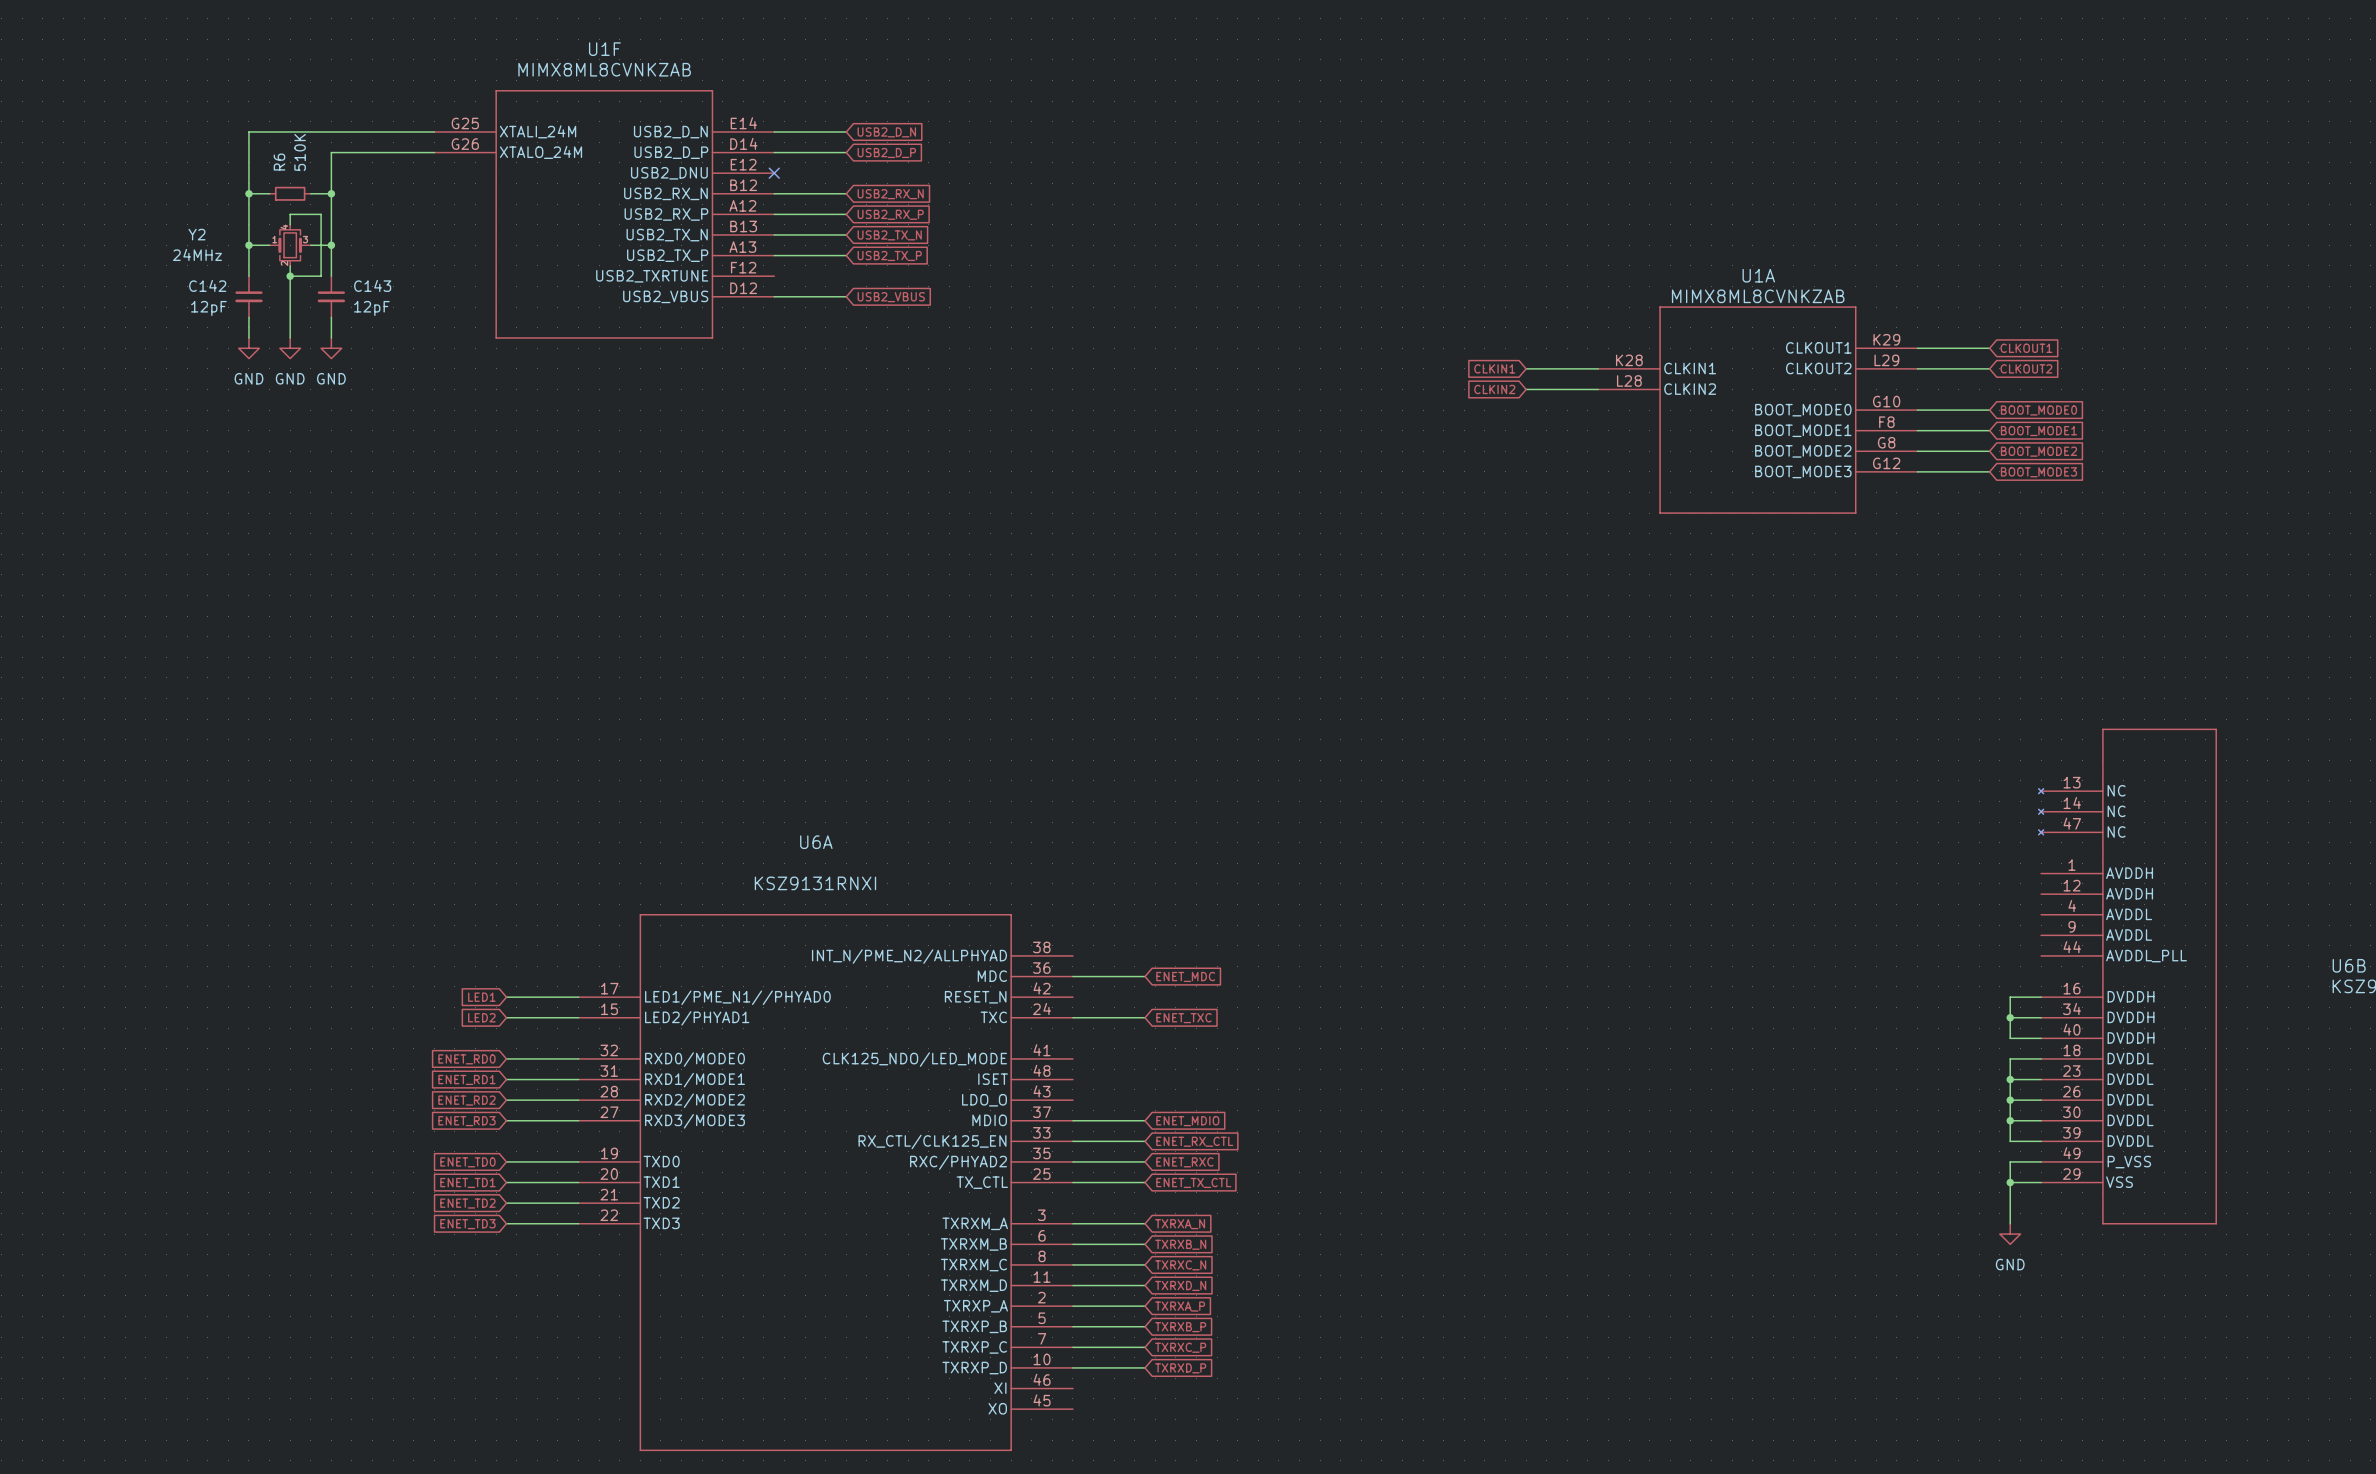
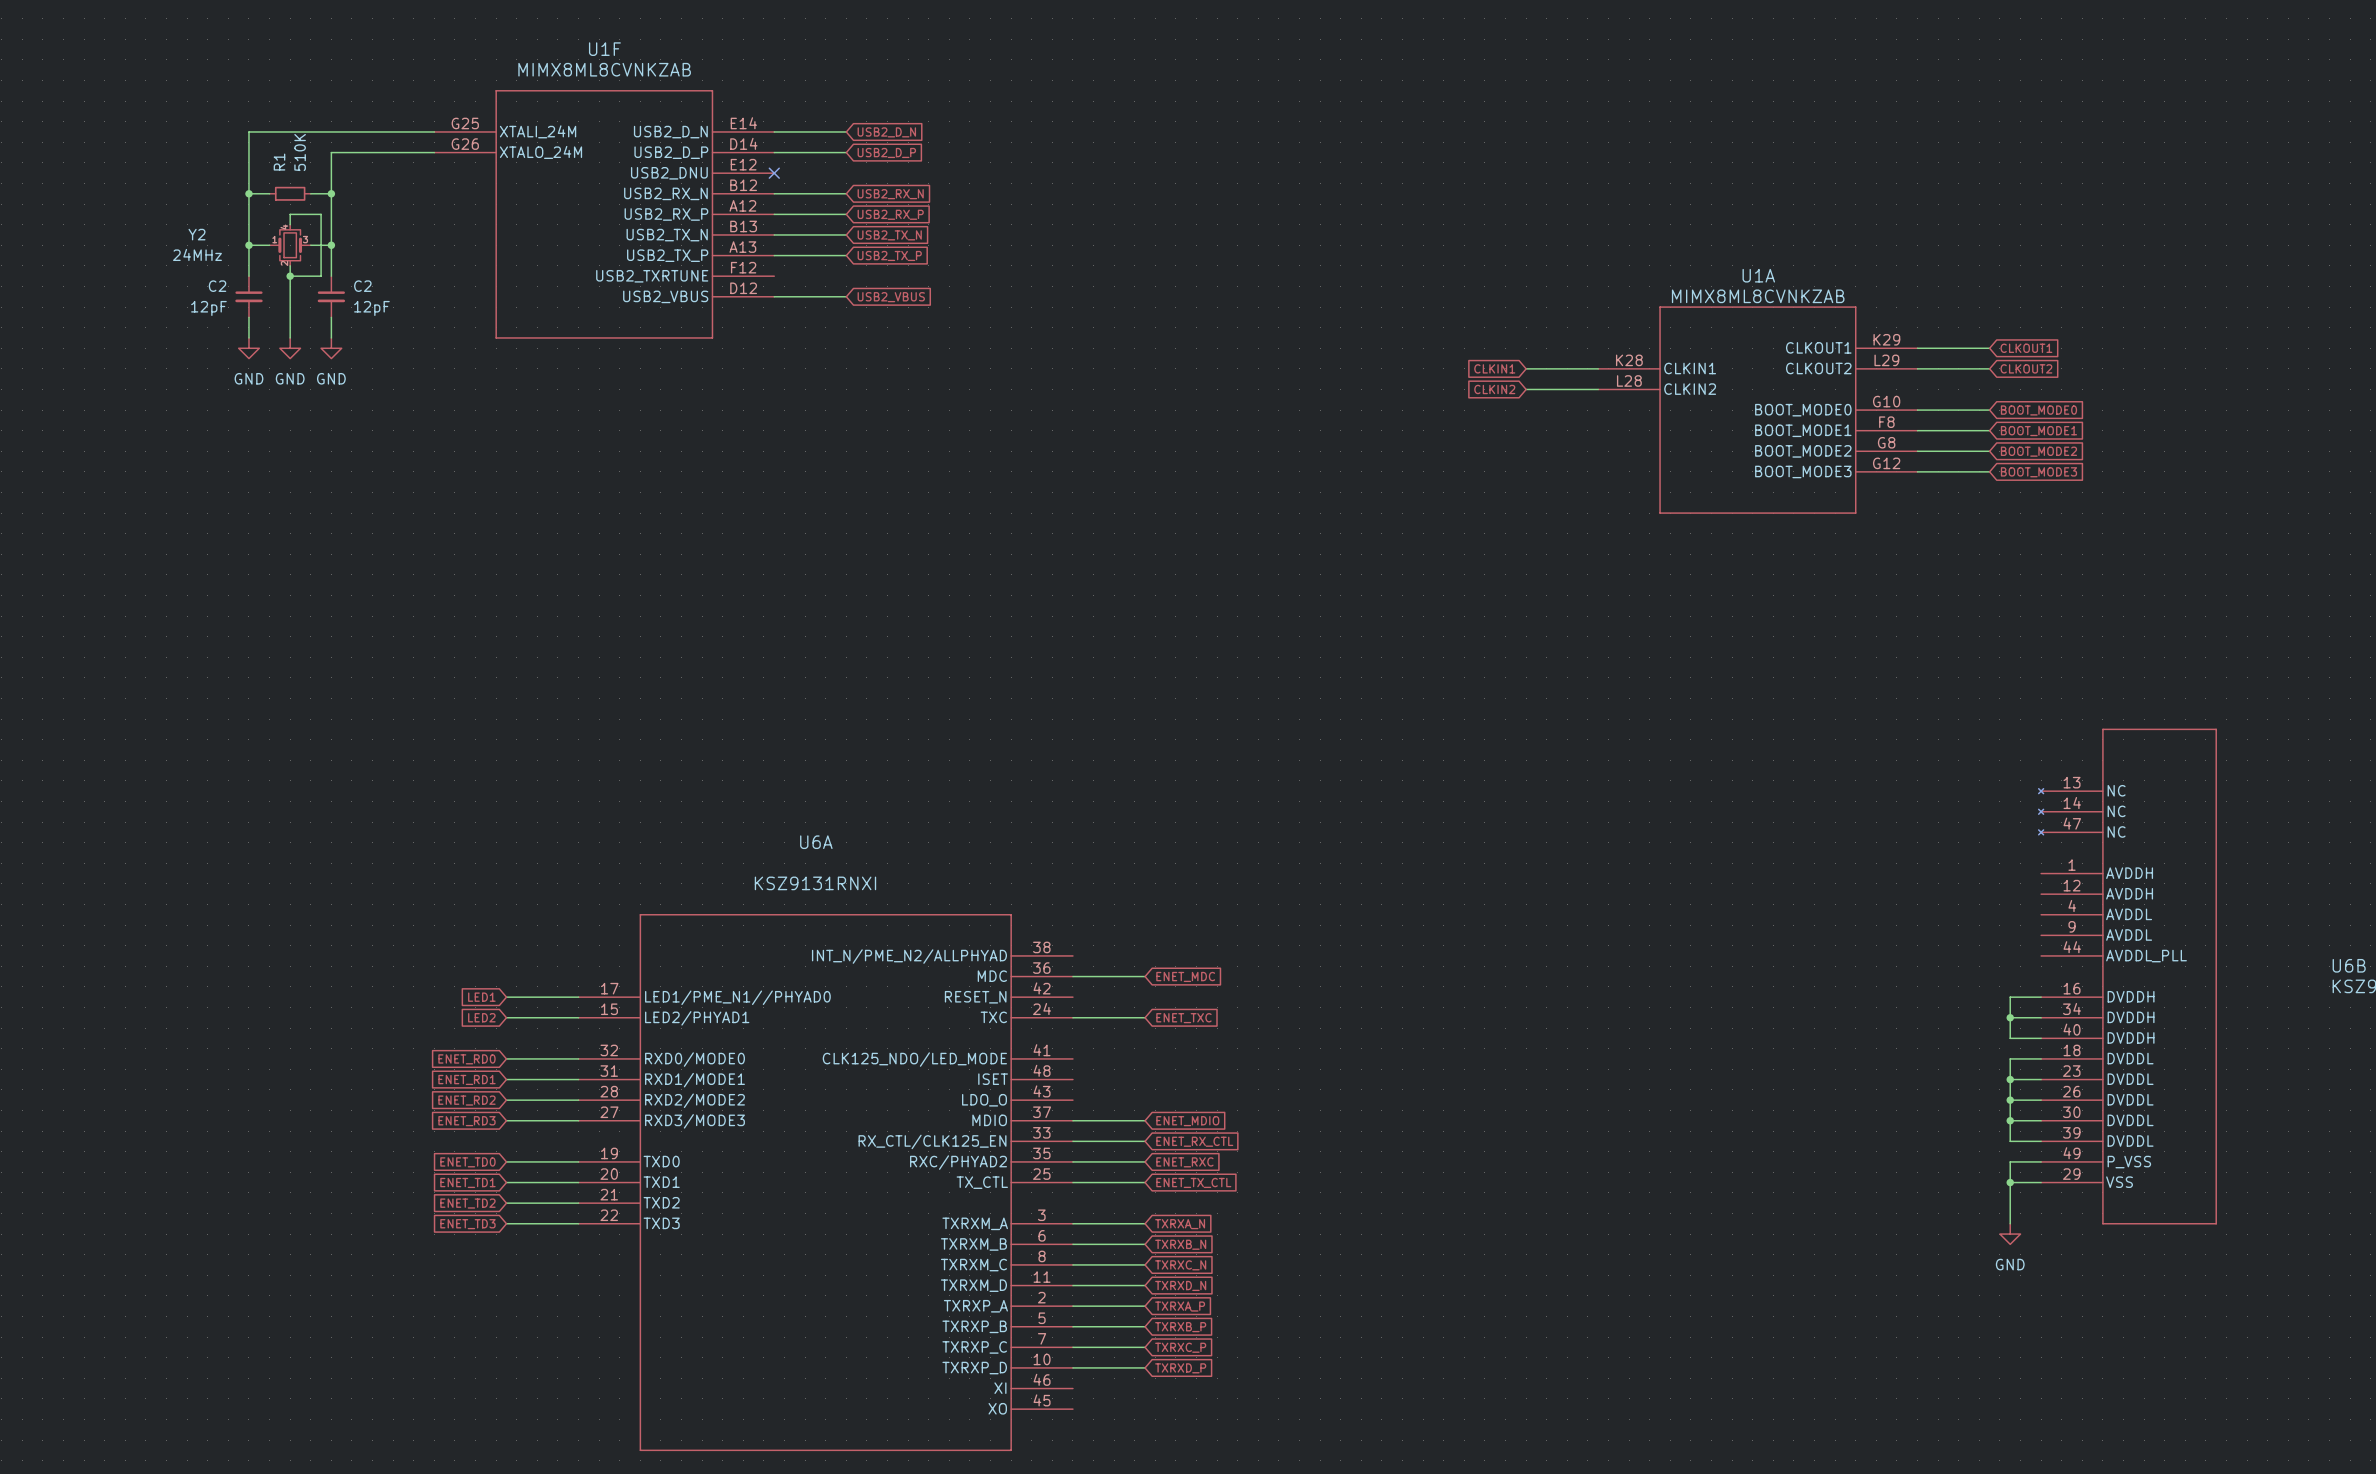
R6 name: R6 (279, 162) -> R1 (279, 162)
C142 name: C142 (207, 285) -> C2 (217, 286)
C143 name: C143 (372, 285) -> C2 (362, 286)

